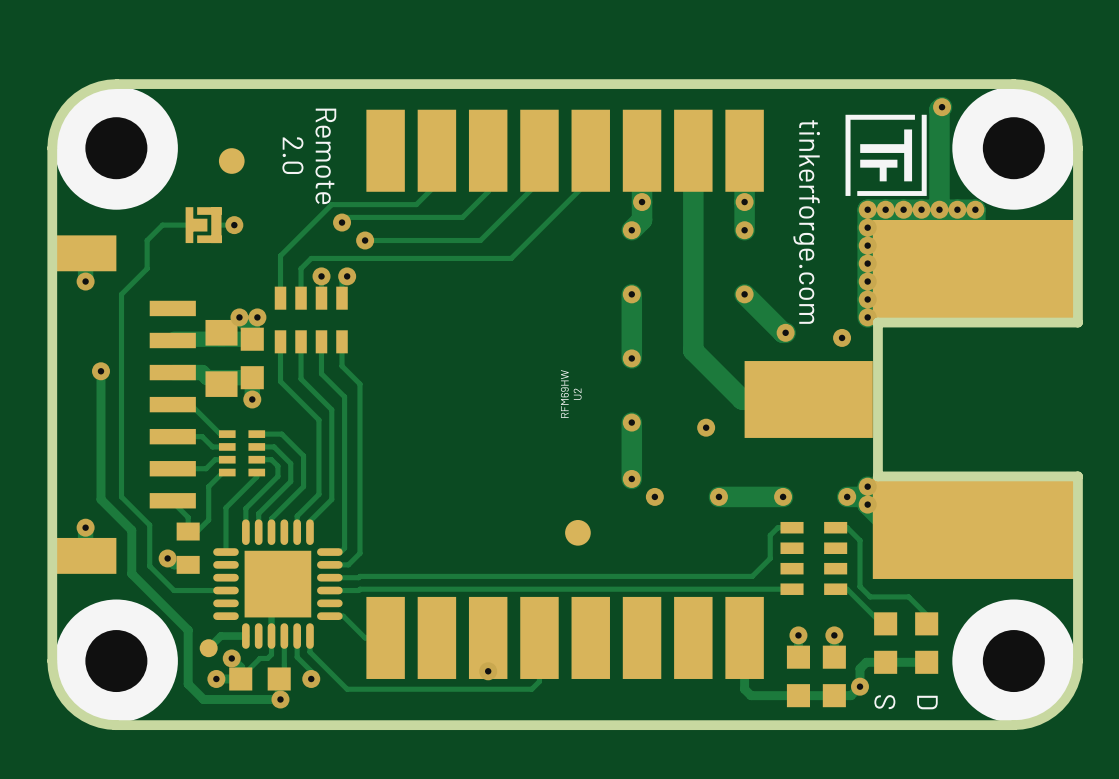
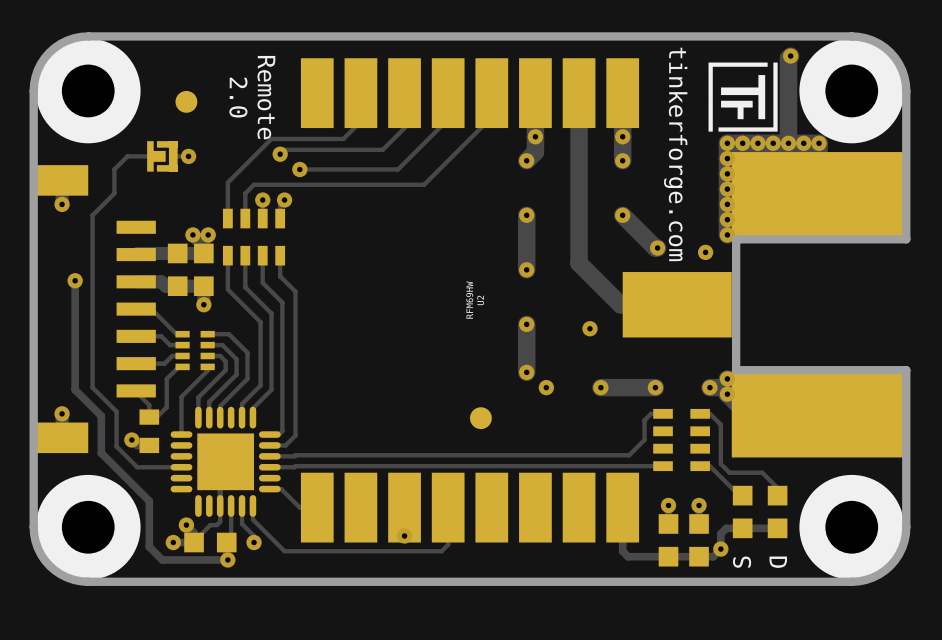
part footprint: [205, 319, 238, 397] -> [167, 243, 188, 297]
track: (245, 636) (220, 636) (208, 648) -> none
part: (208, 648) -> none

